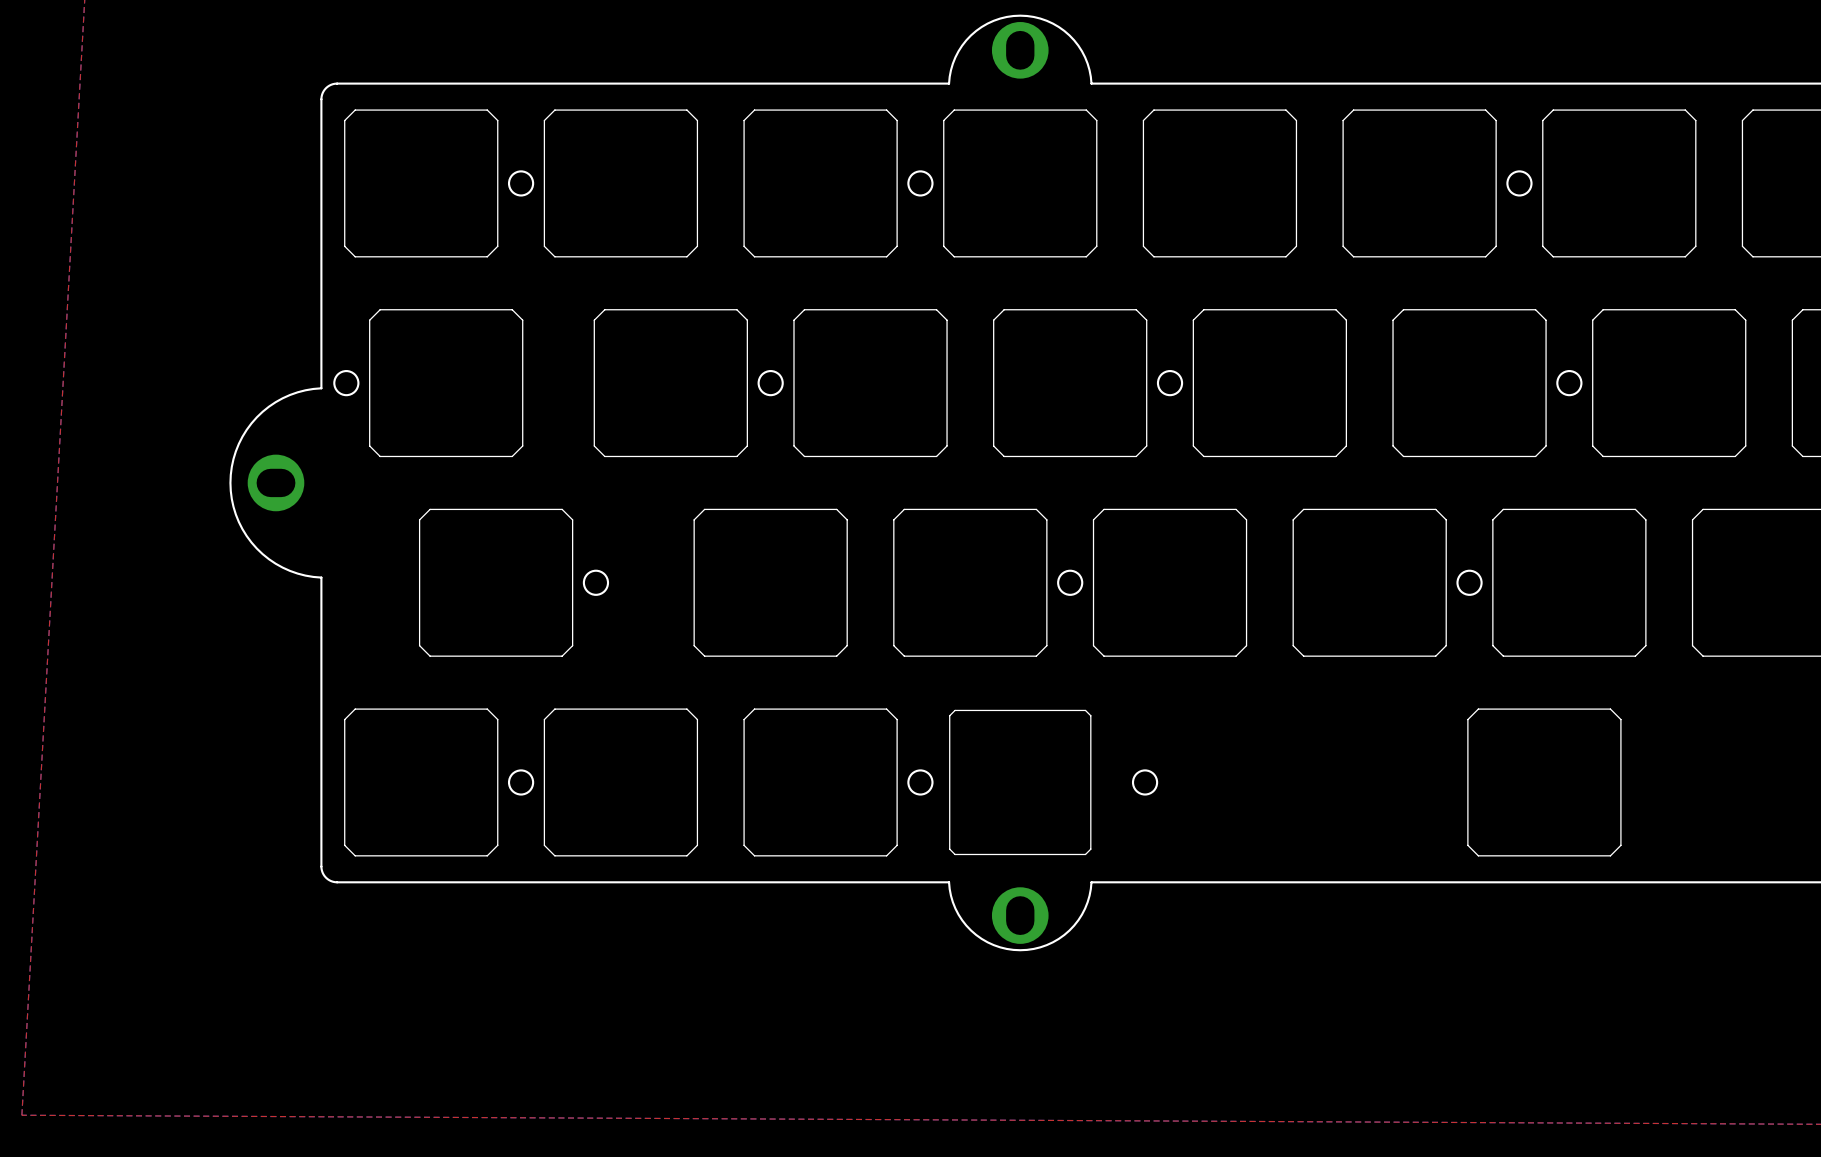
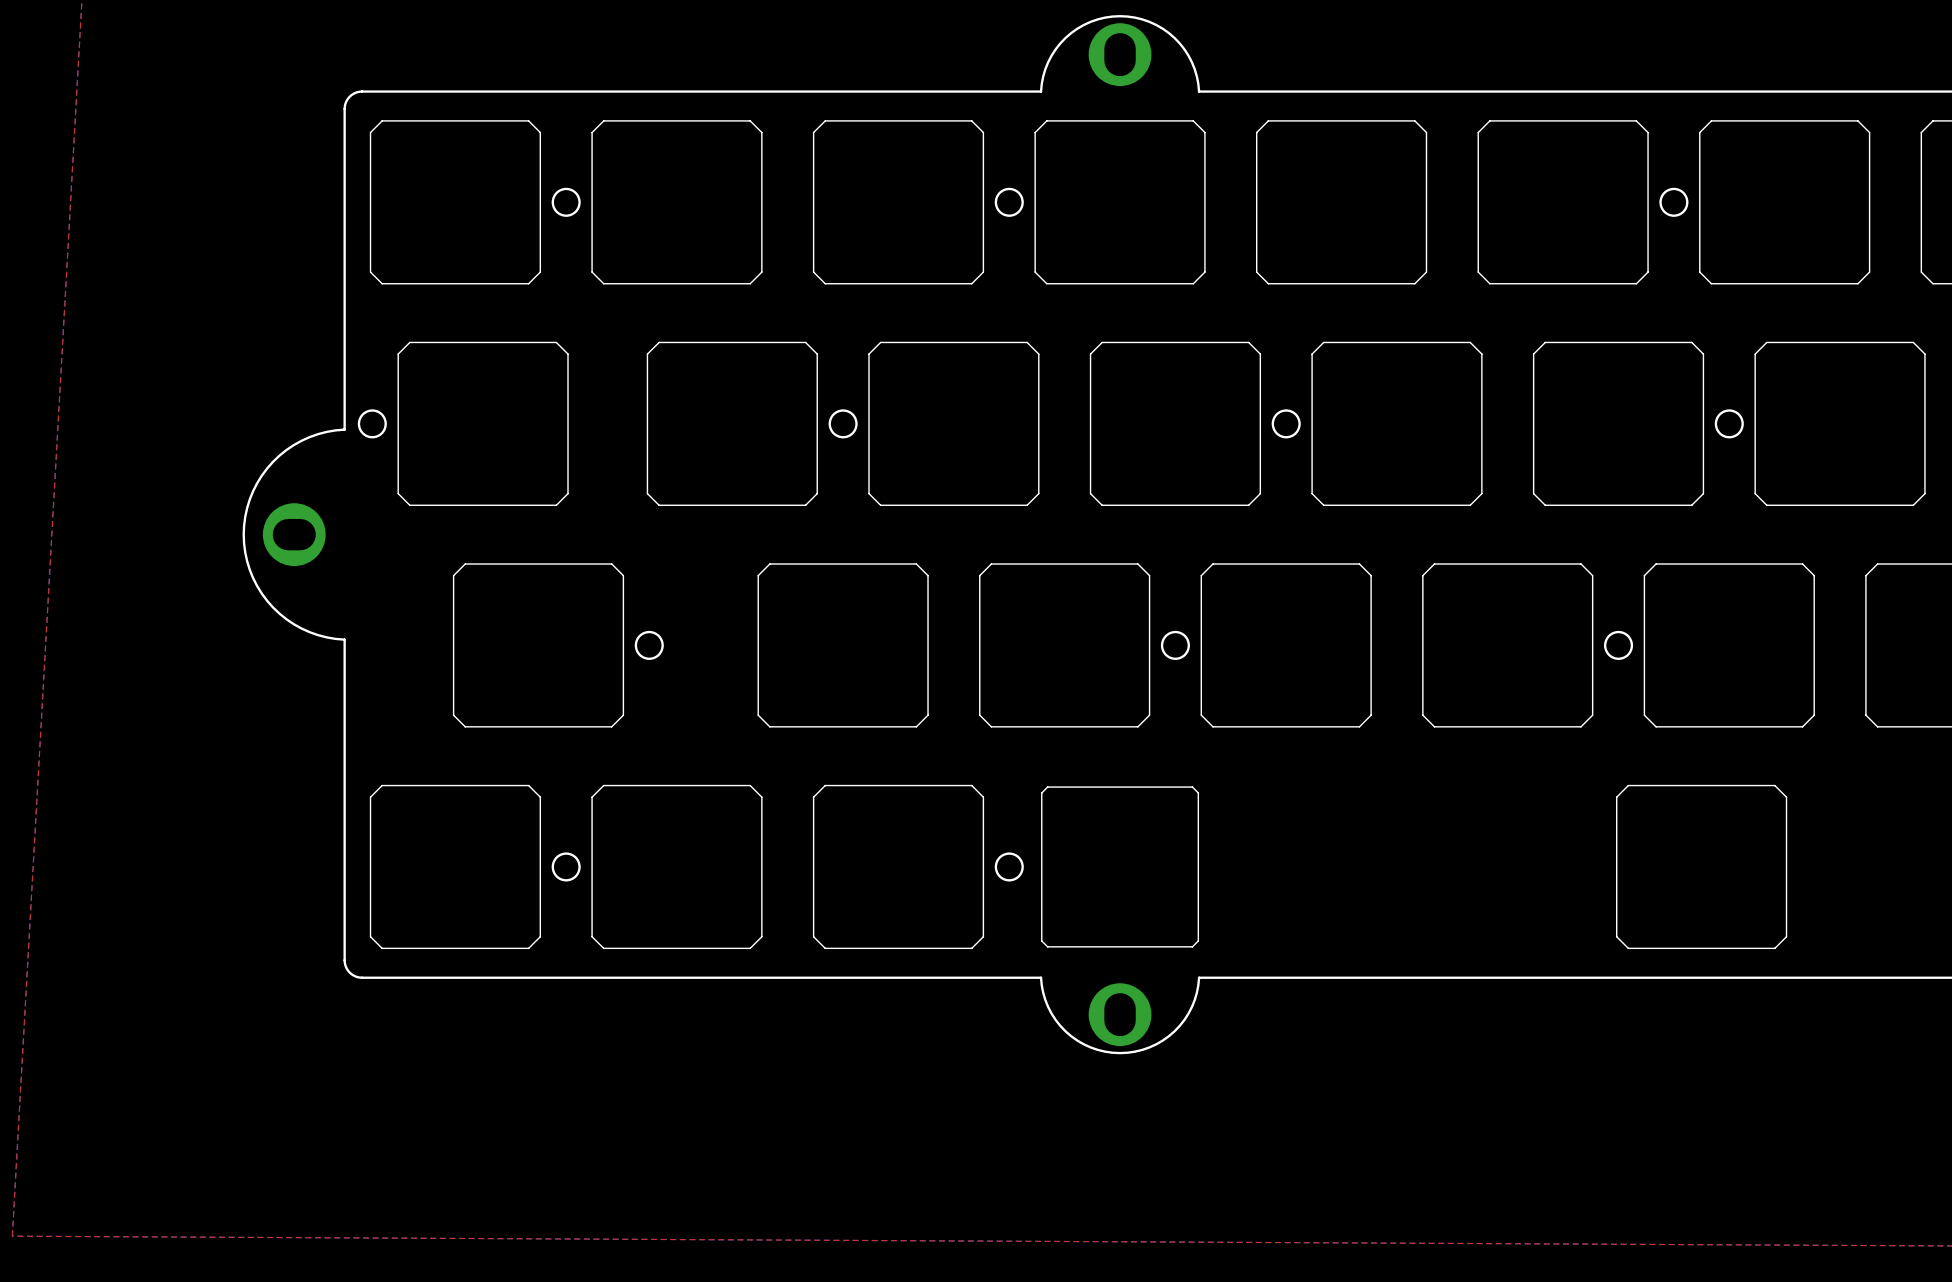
round board edge: [1131, 769, 1159, 796] -> none

